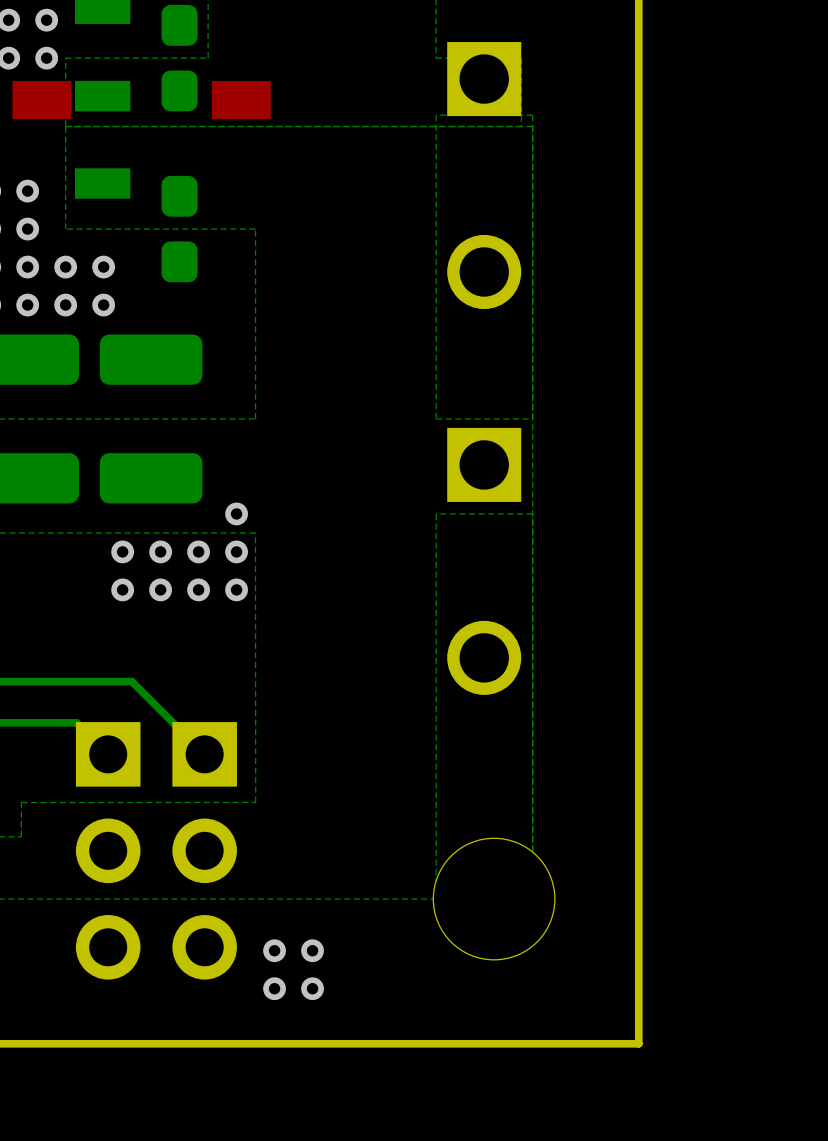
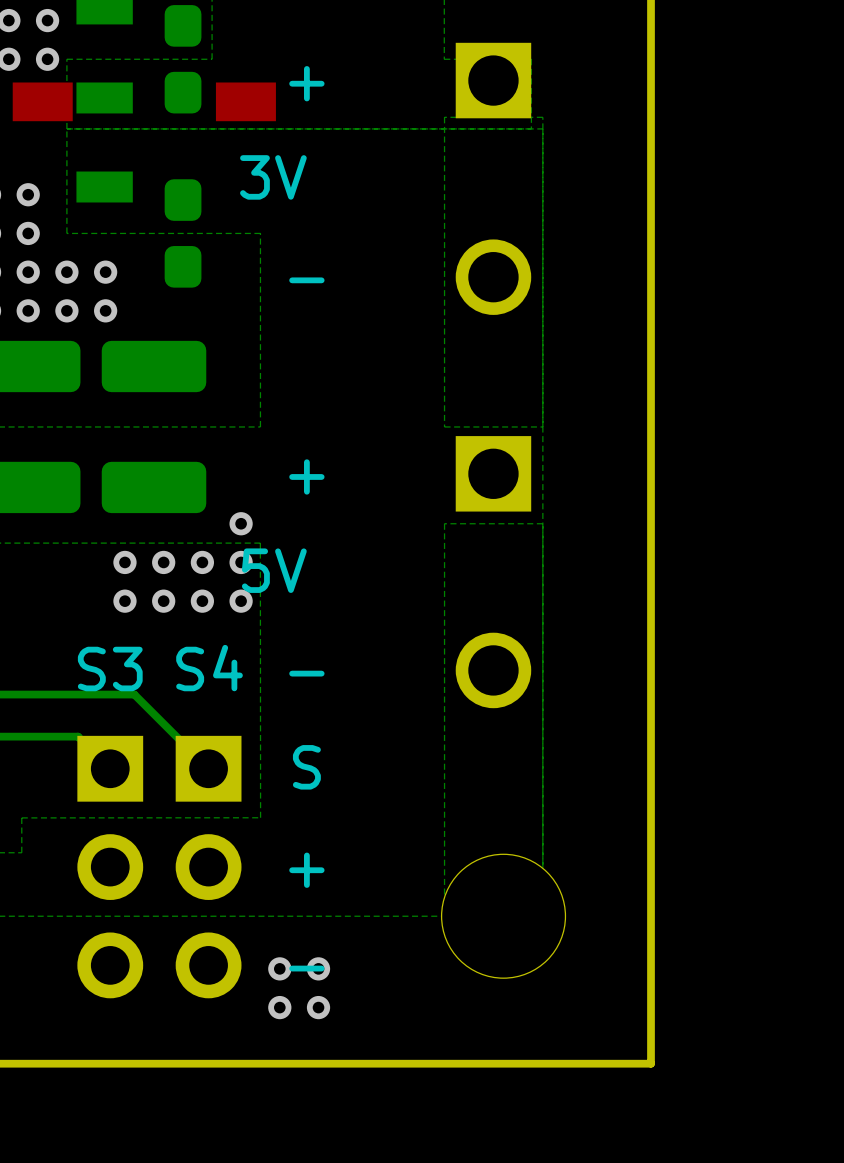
text: none -> + (306, 83)
text: none -> 3V (273, 177)
text: none -> - (306, 280)
text: none -> + (306, 476)
text: none -> 5V (274, 570)
text: none -> S4 (209, 668)
text: none -> S3 (110, 669)
text: none -> - (306, 673)
text: none -> S (306, 767)
text: none -> + (306, 870)
text: none -> - (306, 968)

